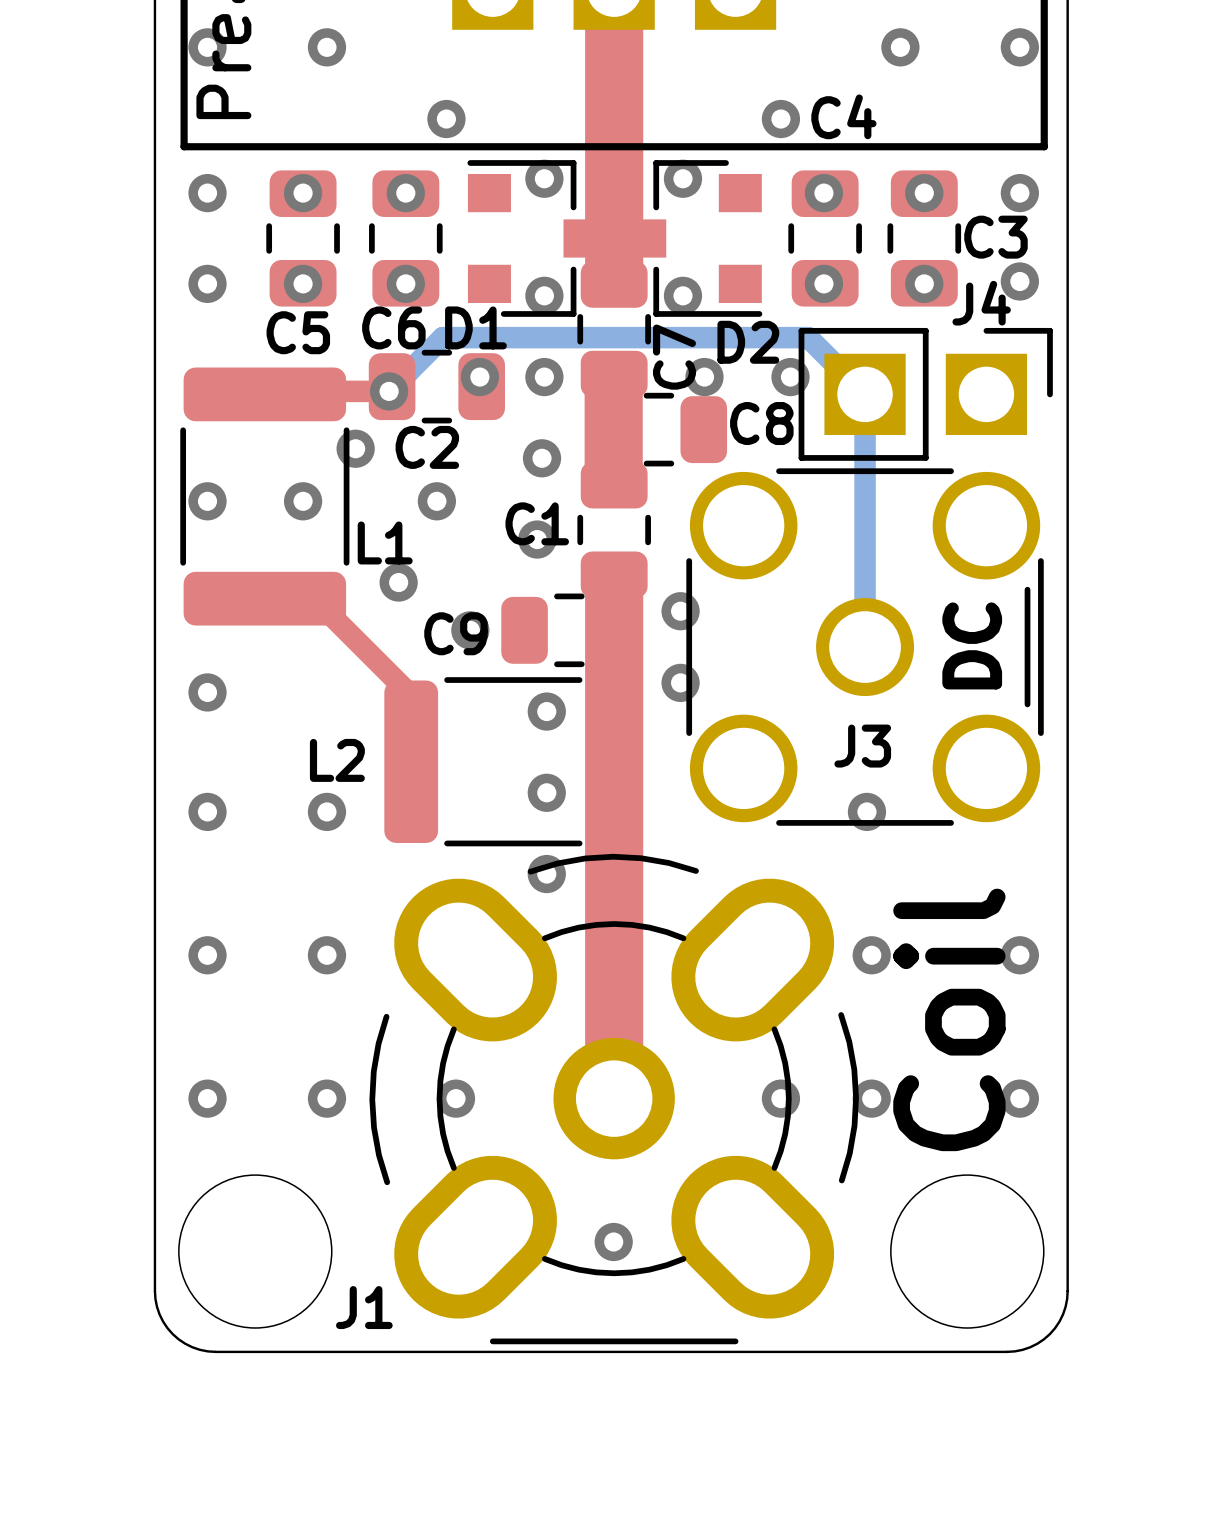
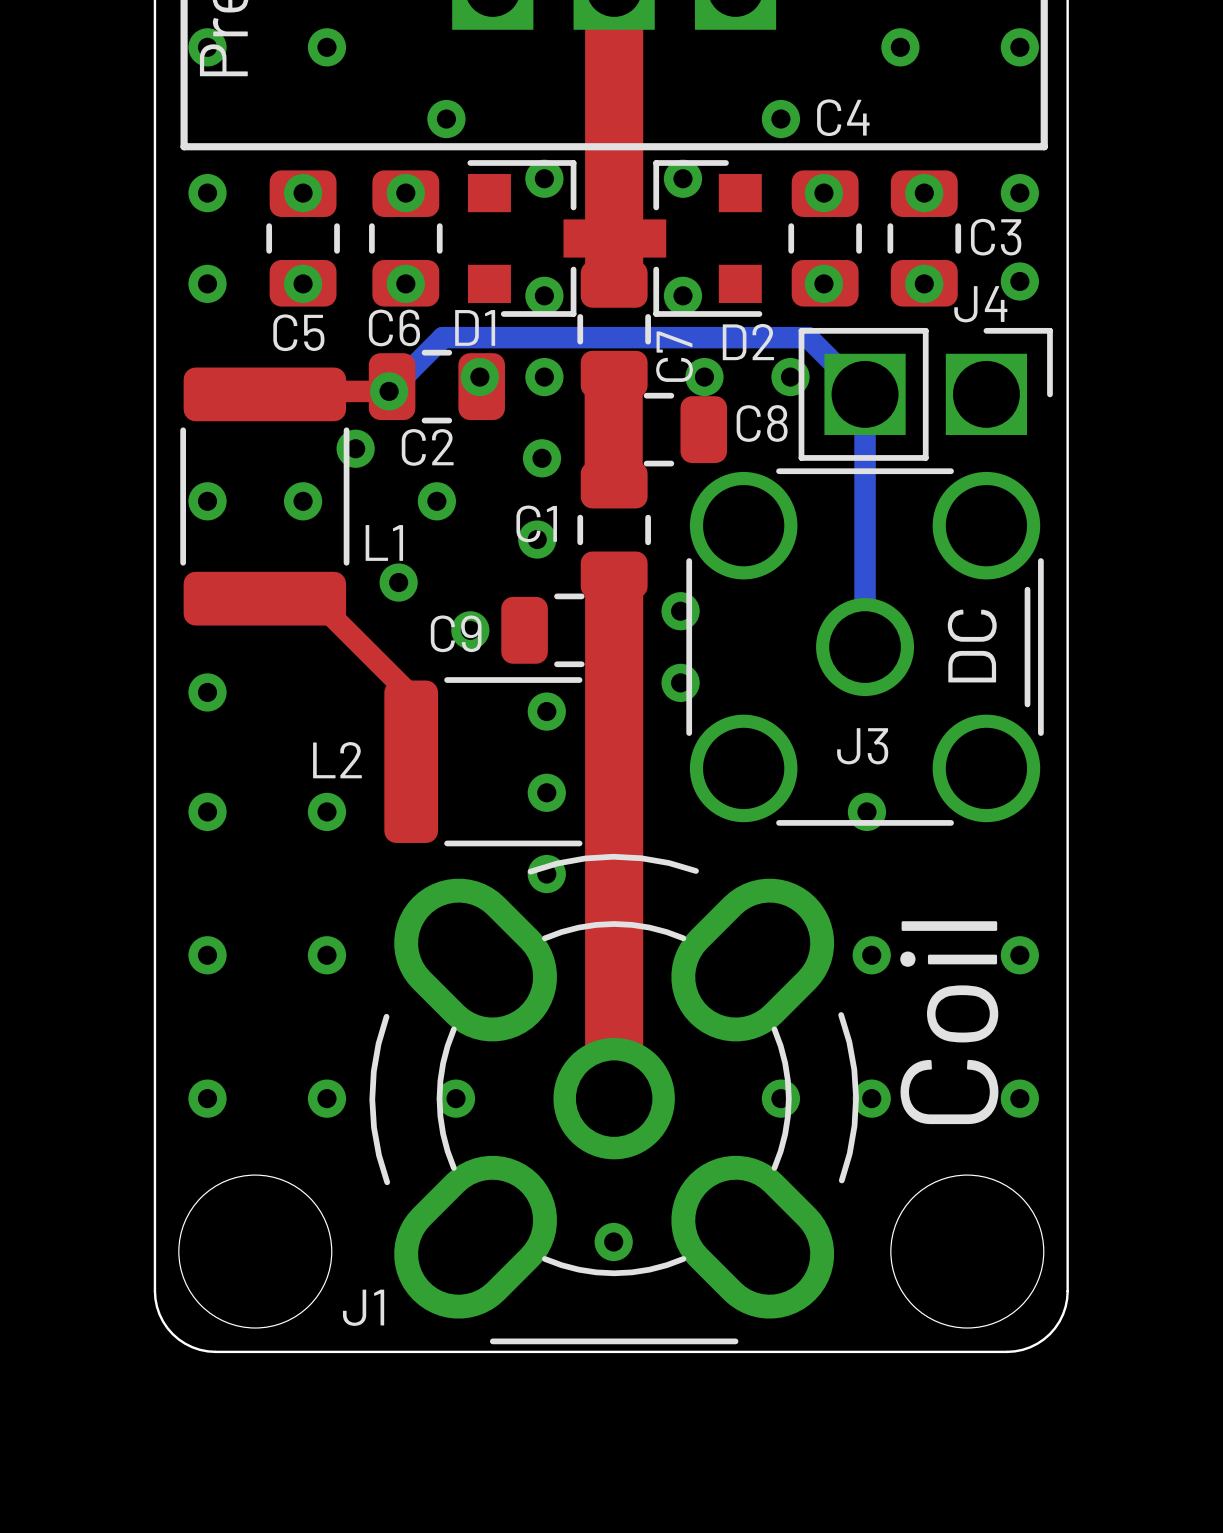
J4 footprint: [798, 327, 1053, 461] -> [798, 327, 1053, 461]

